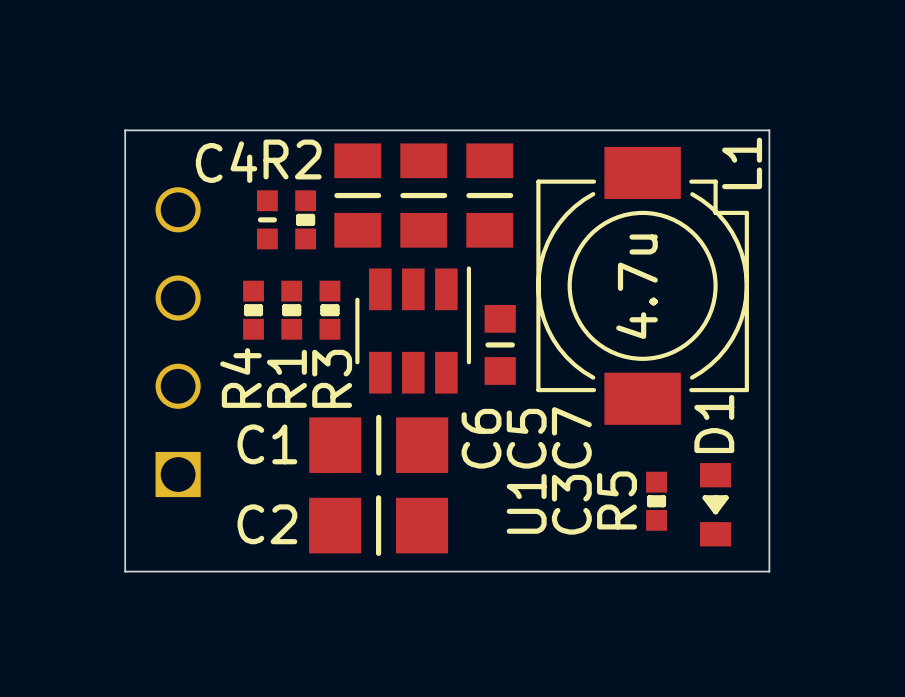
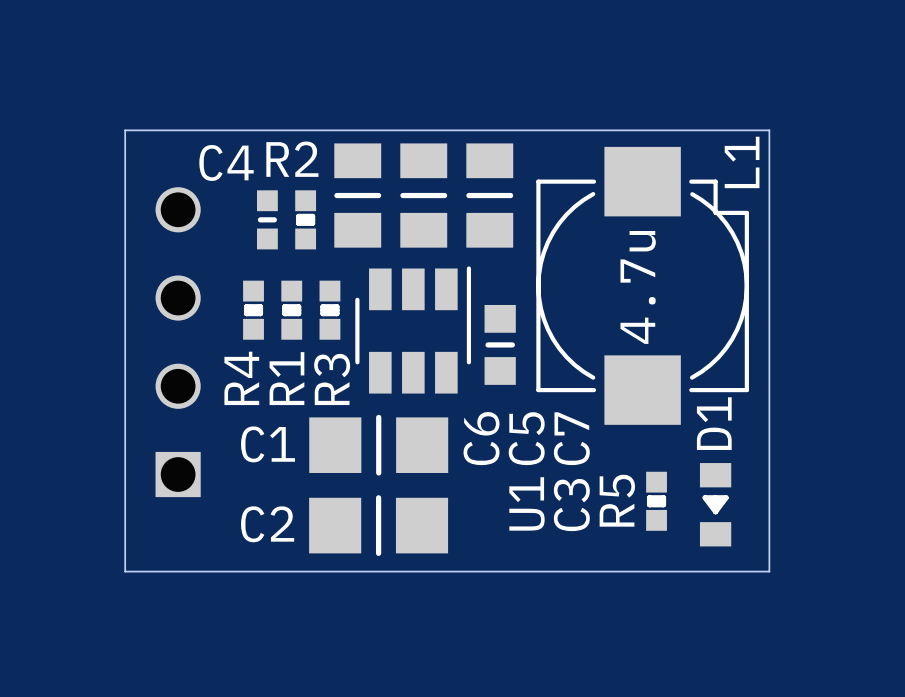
L1 footprint: [536, 146, 749, 425] -> [536, 146, 749, 425]

